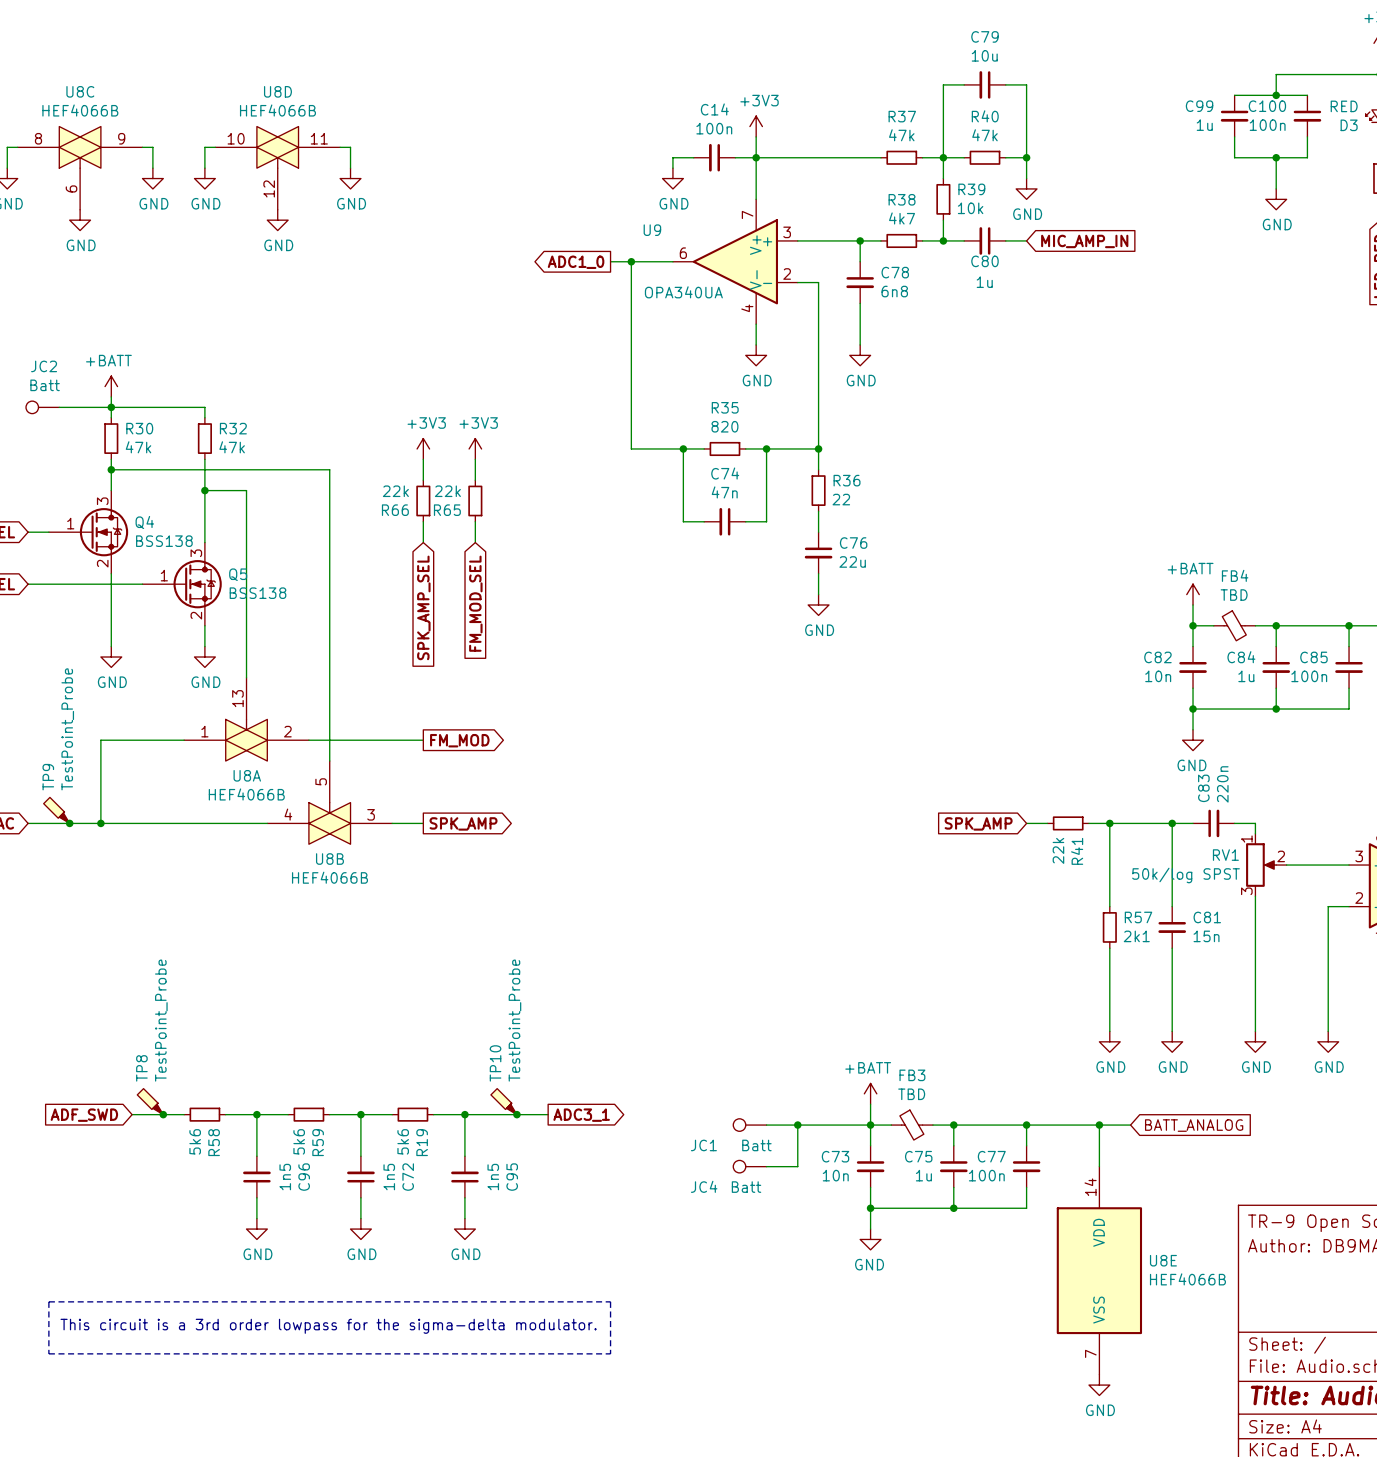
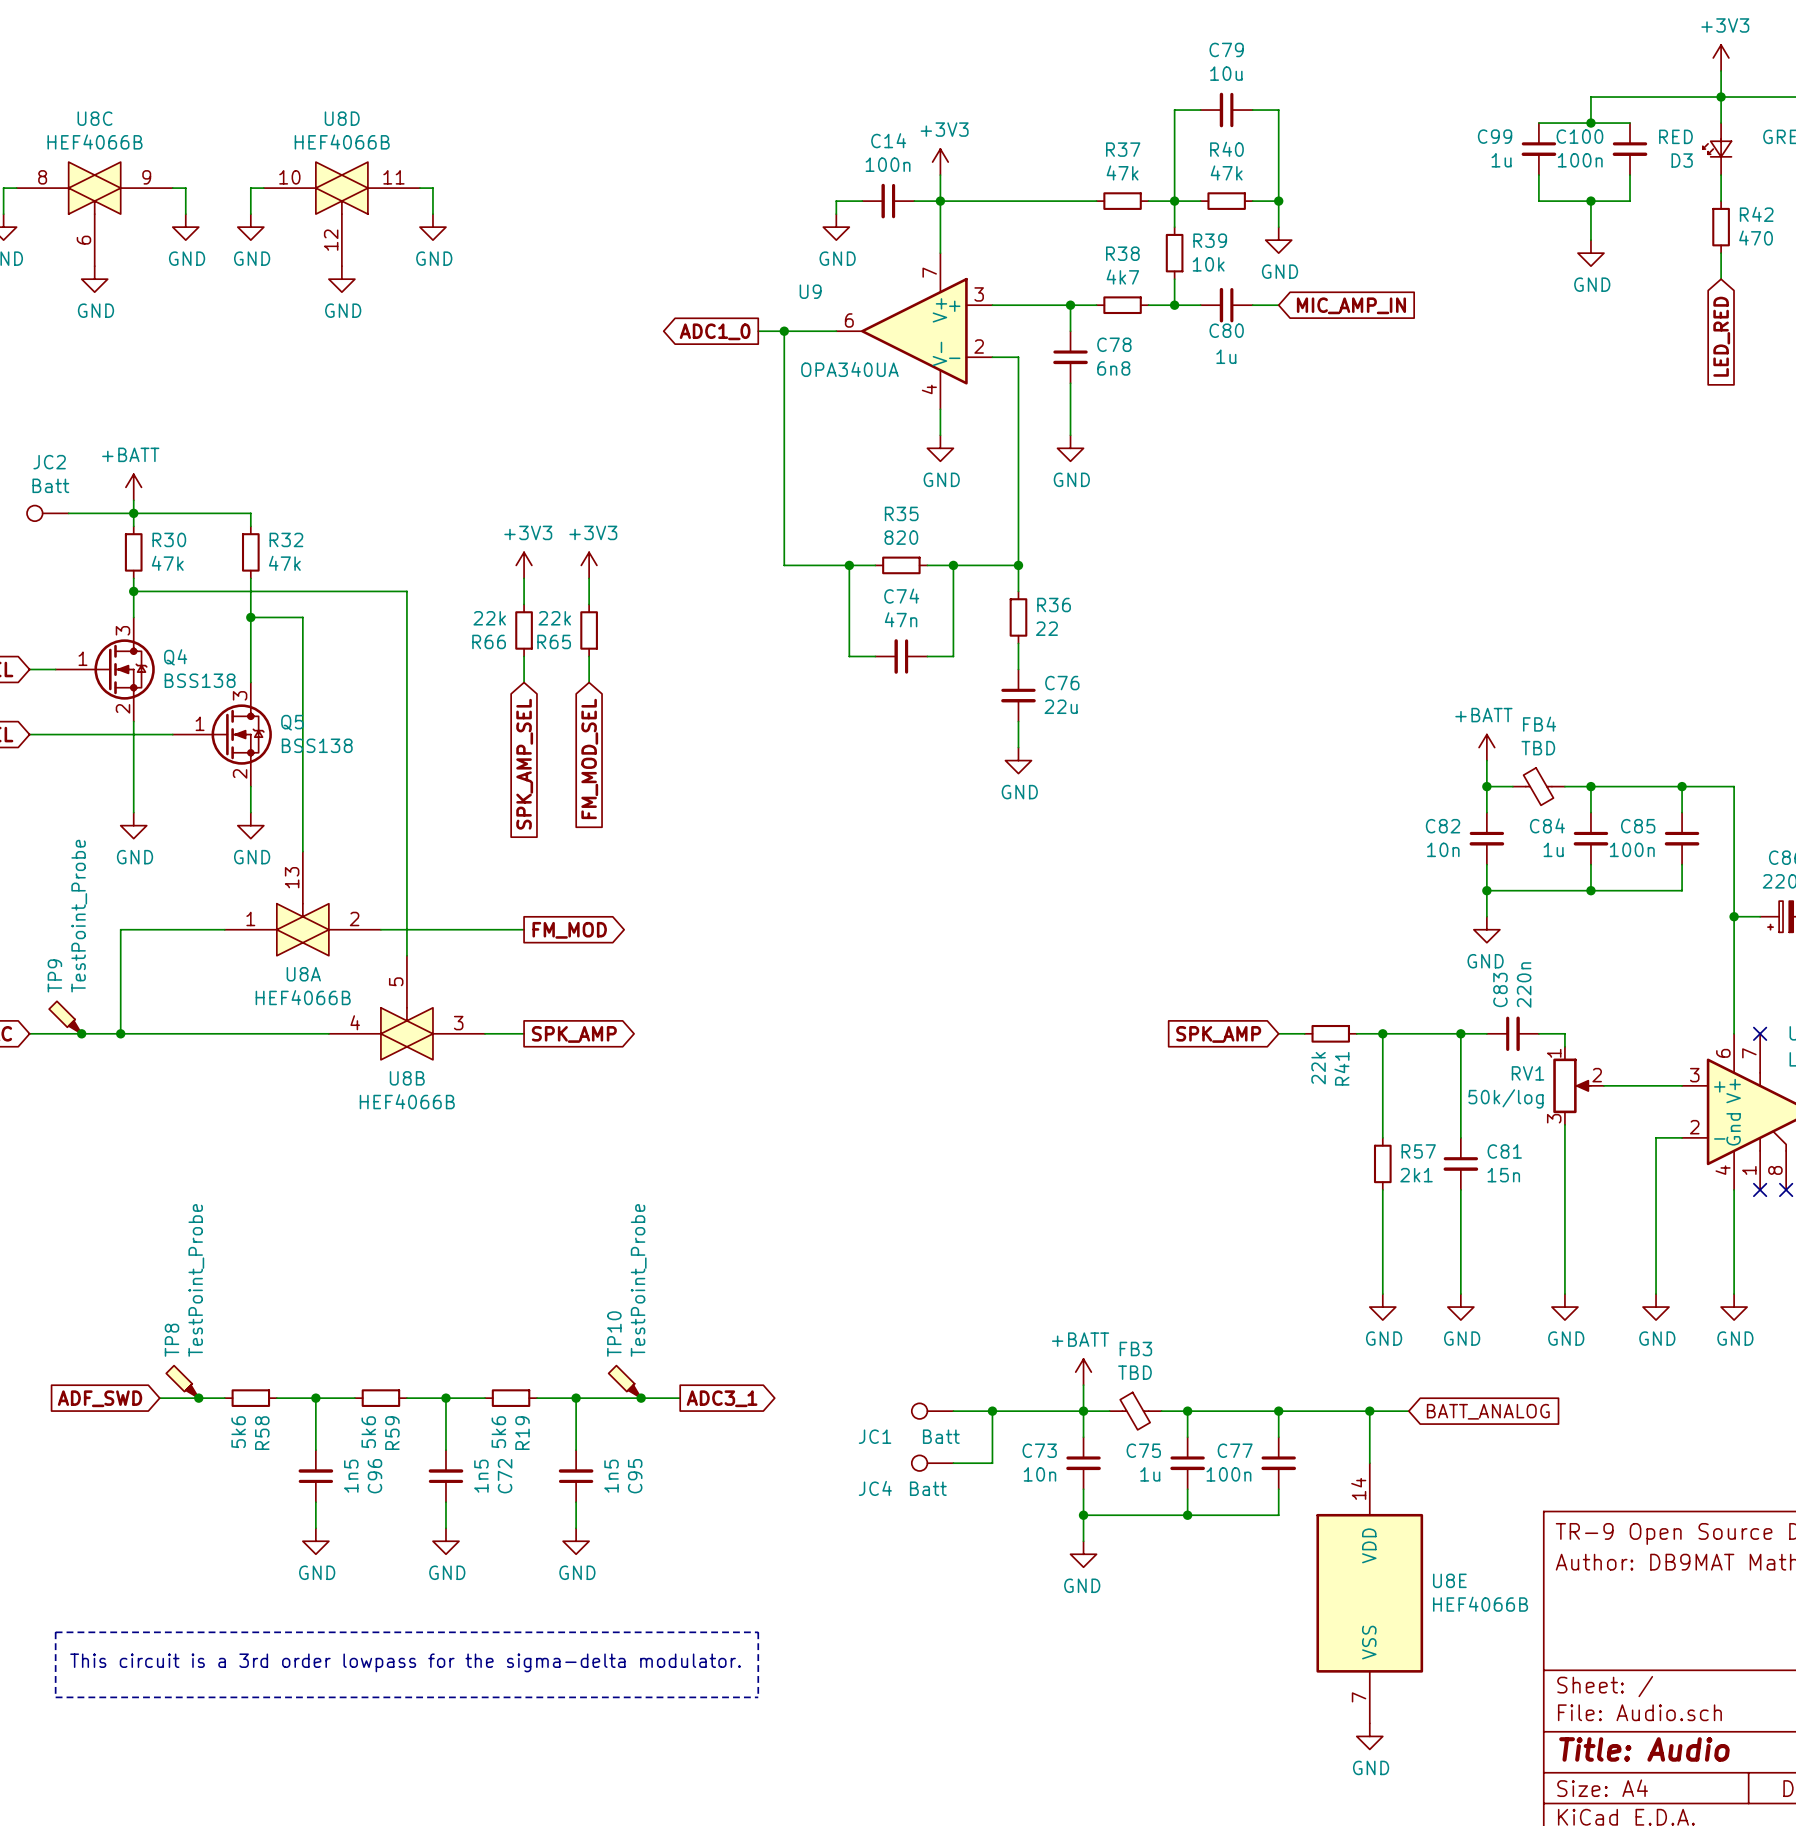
RV1 value: 50k/log SPST (1186, 875) -> 50k/log (1506, 1098)

